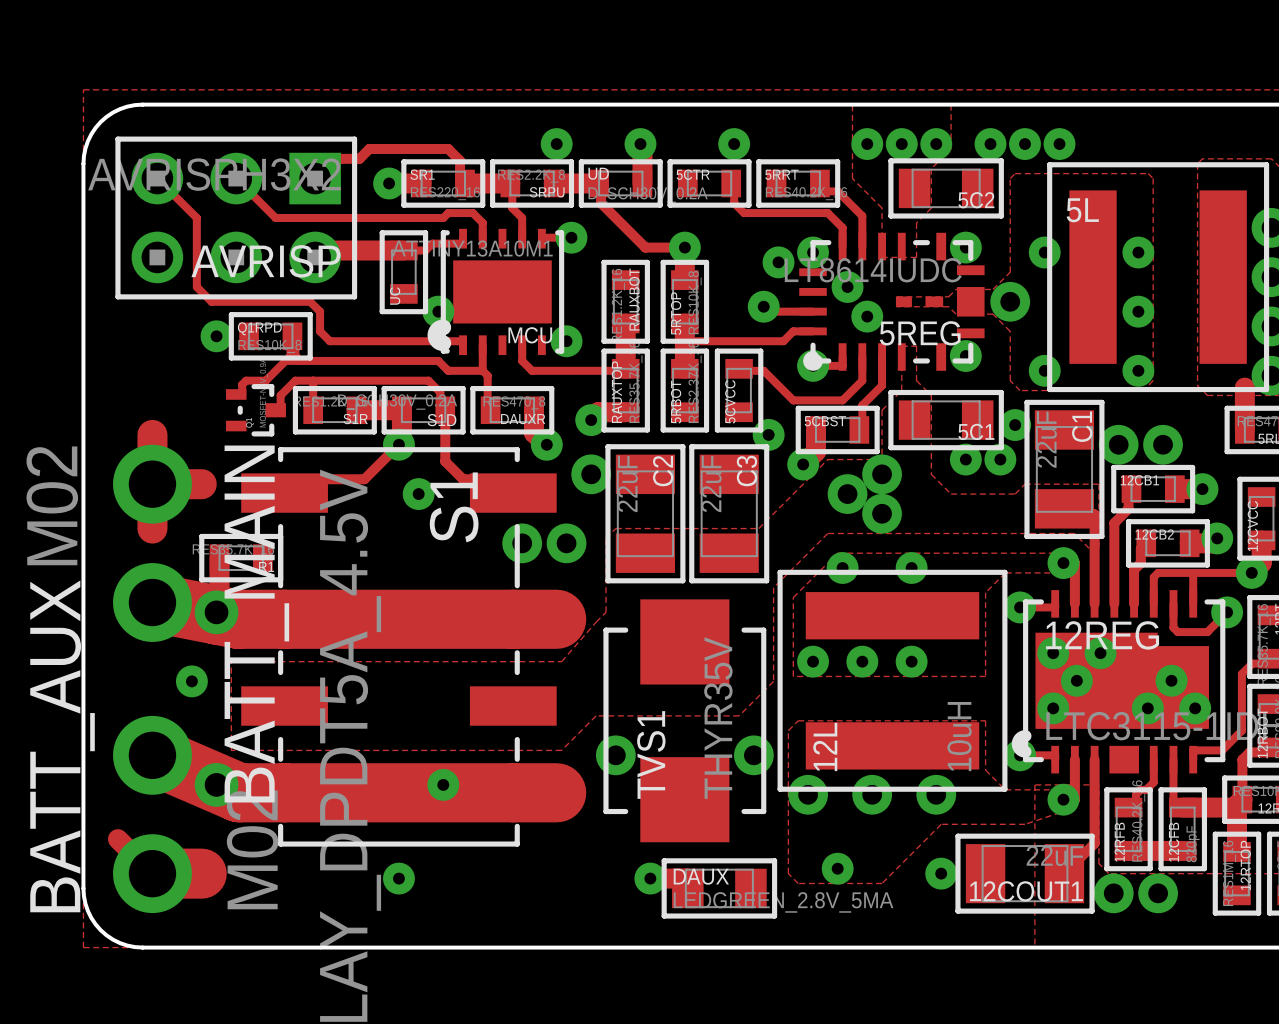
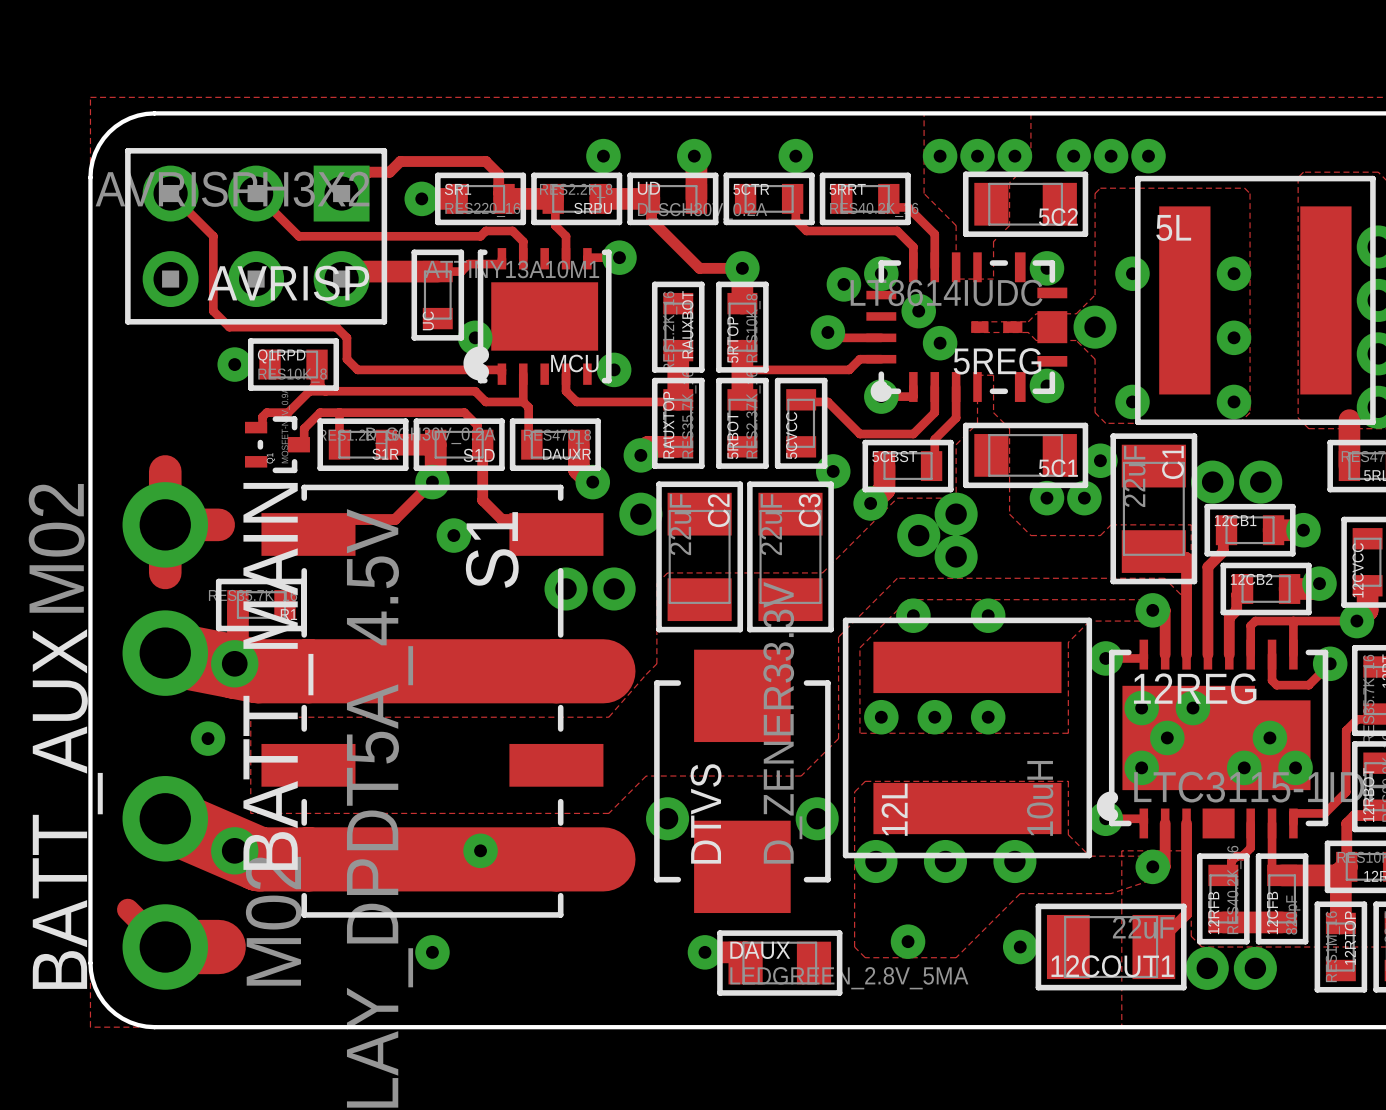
TVS1 value: THYR35V (718, 718) -> D_ZENER33.3V (782, 722)
TVS1 name: TVS1 (651, 755) -> DTVS (706, 813)

